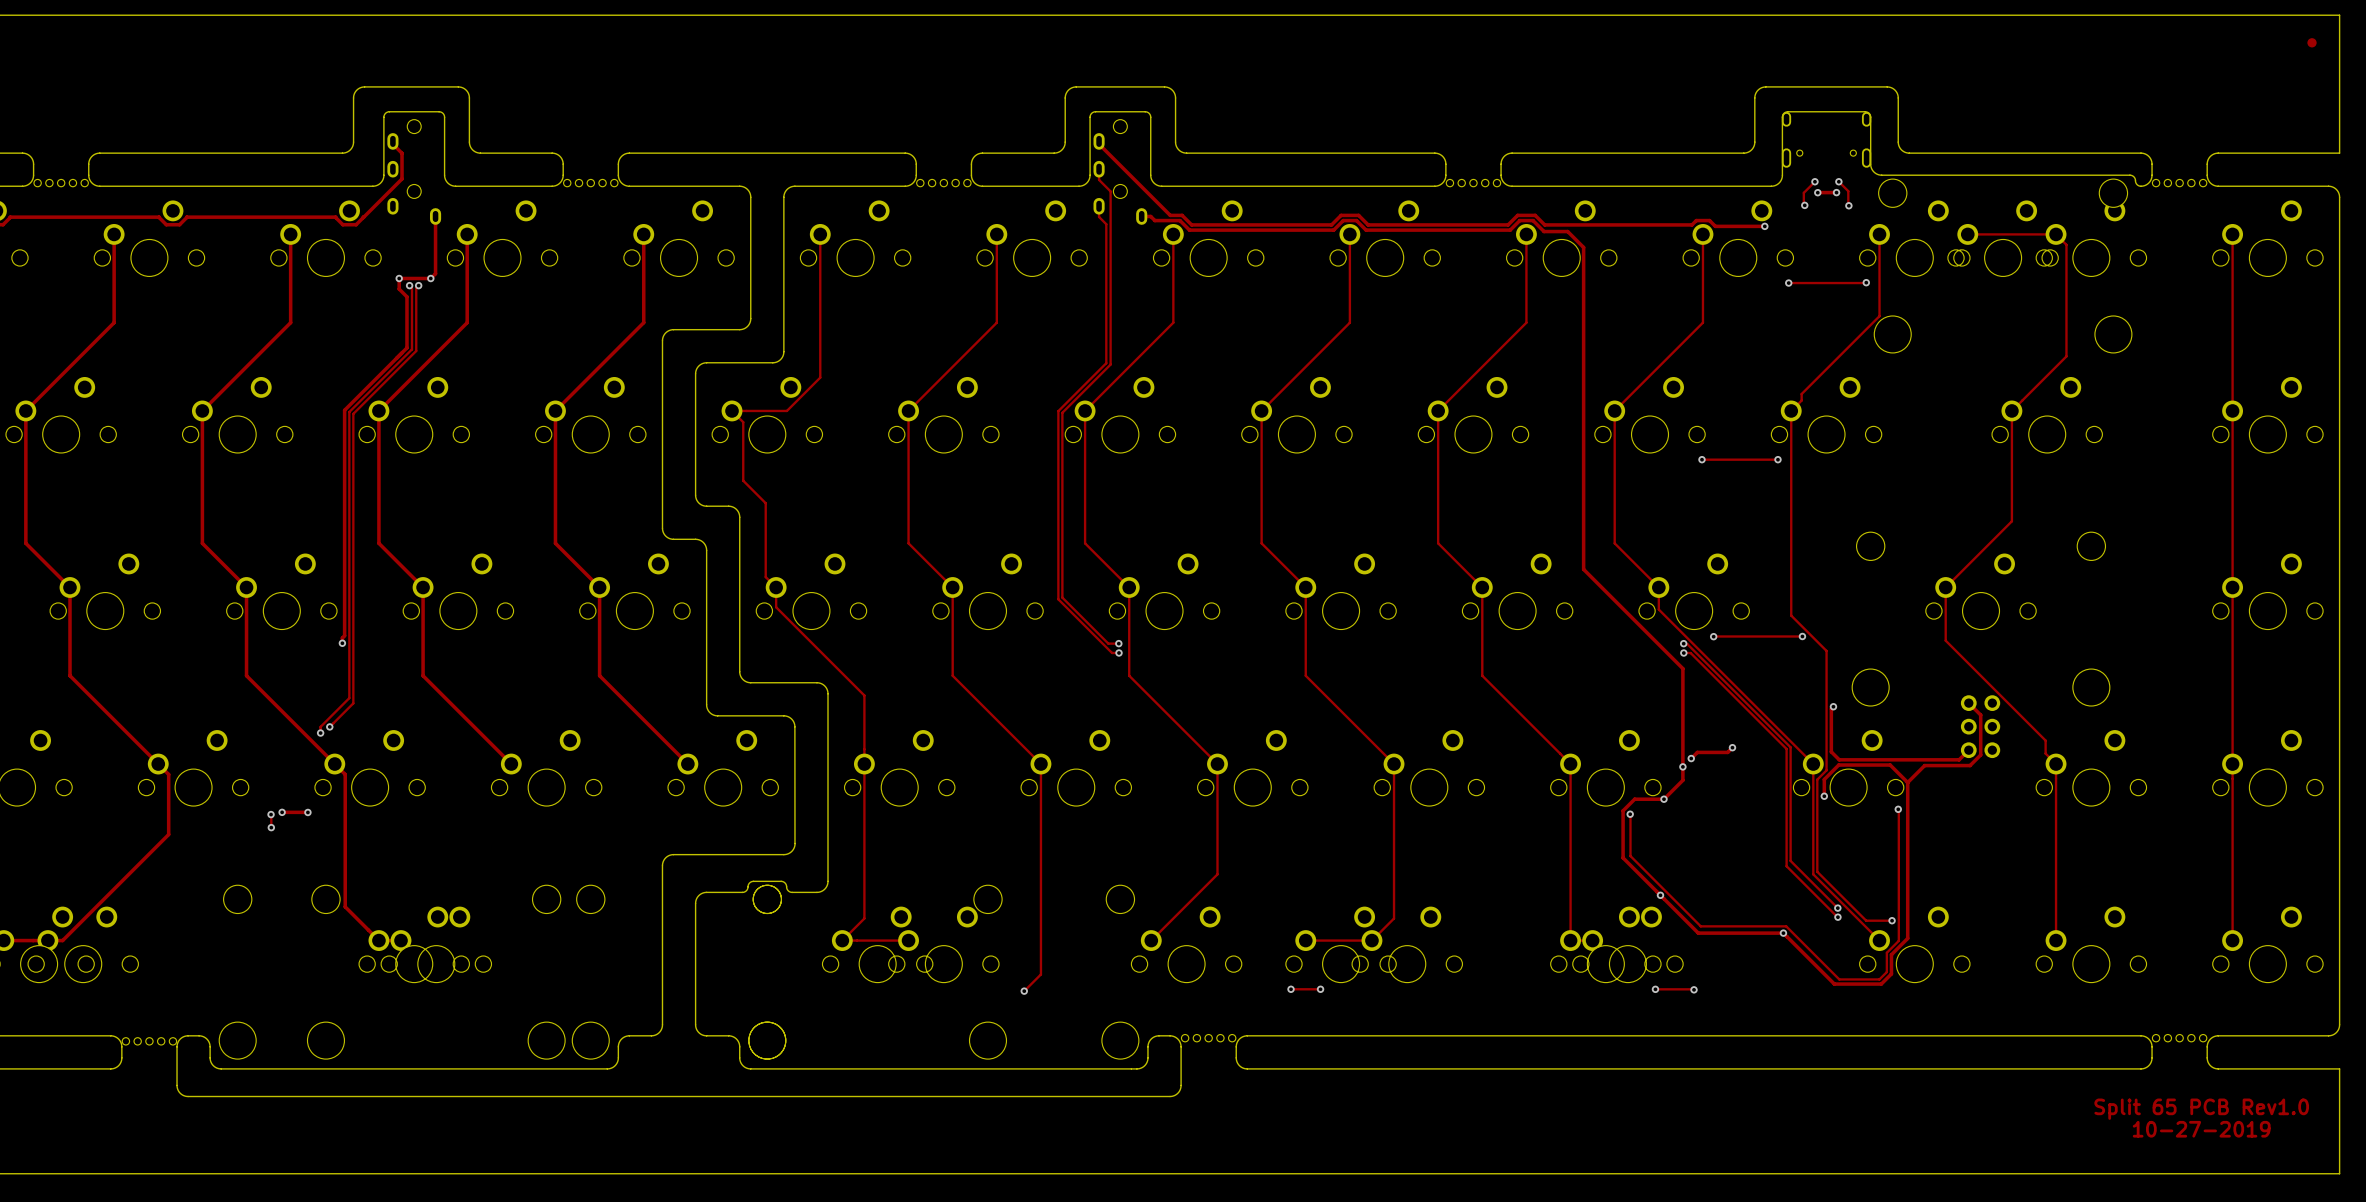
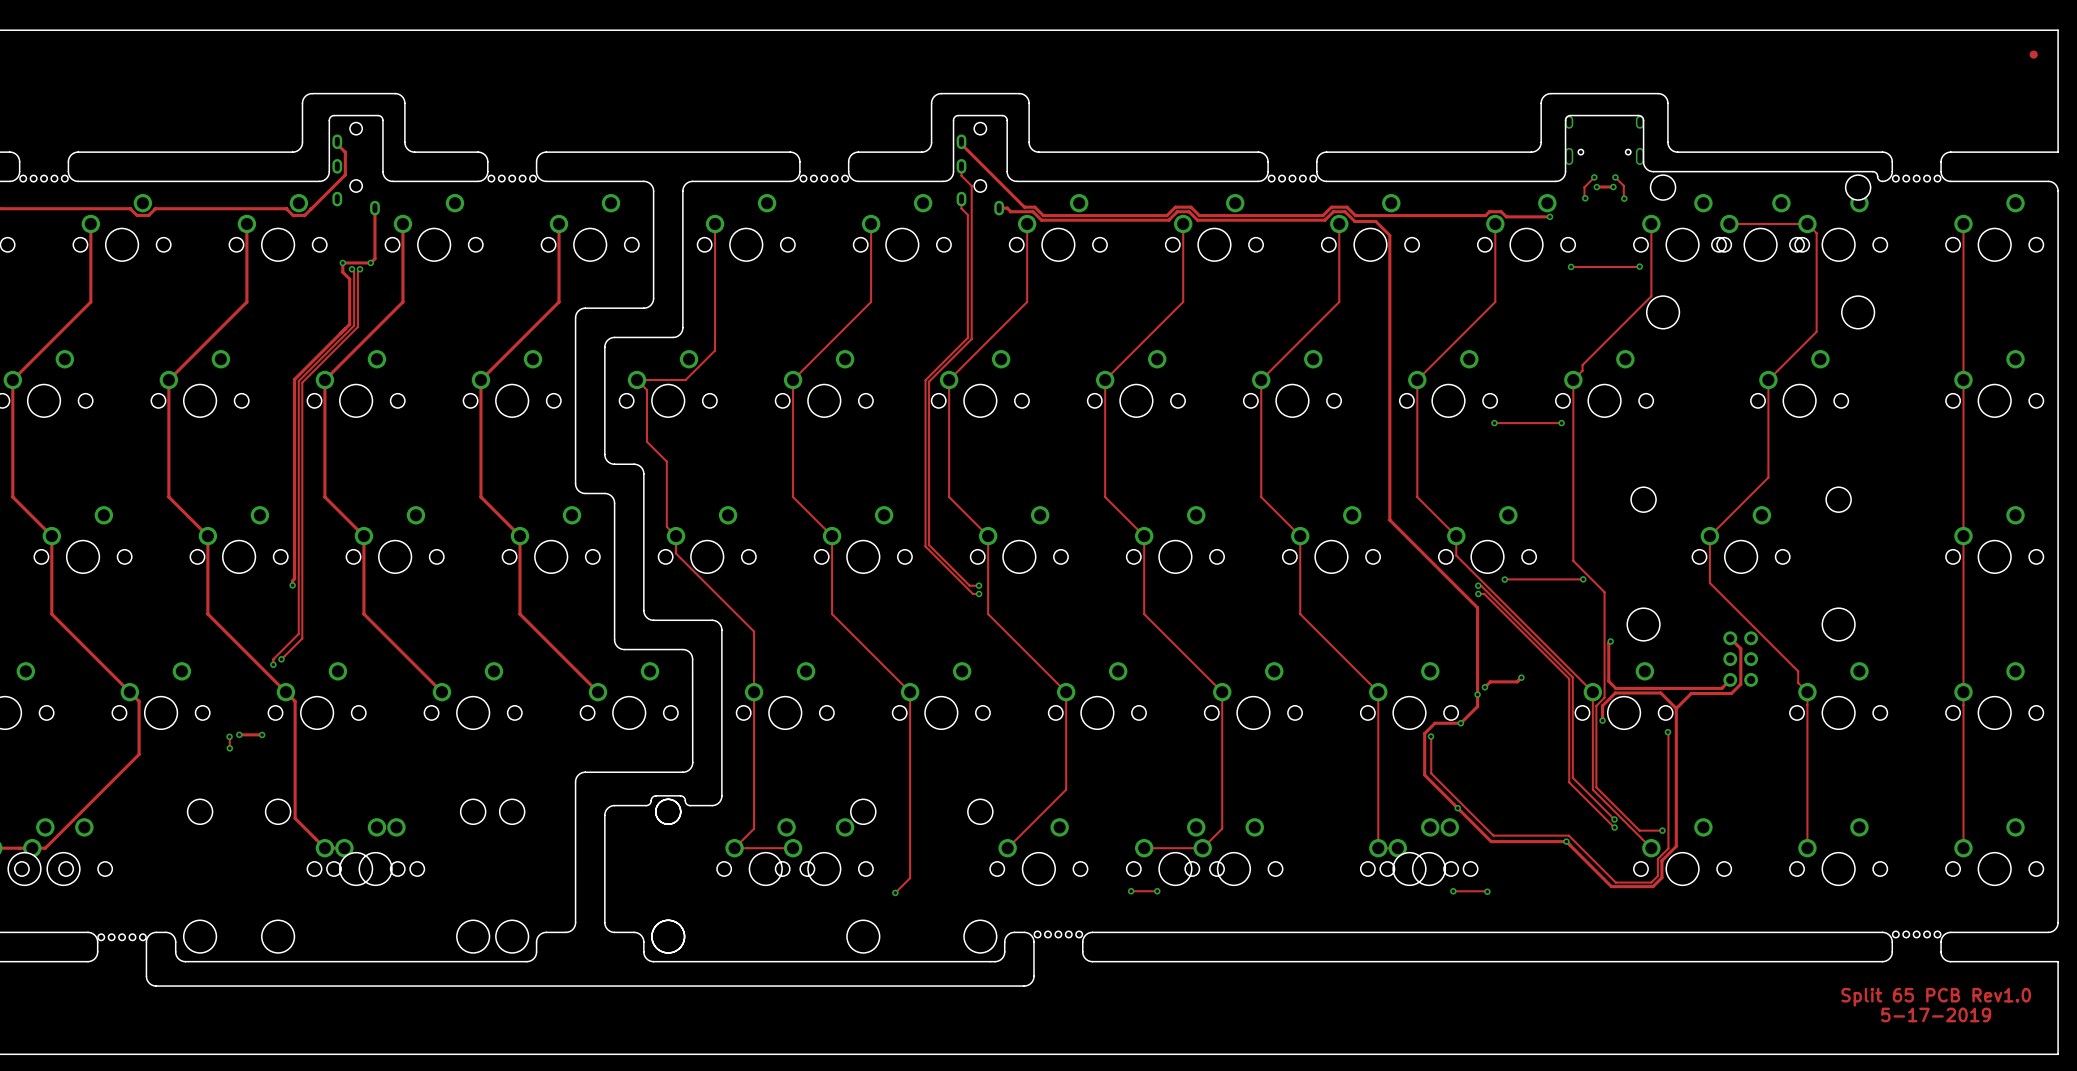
text: 10-27-2019 (2201, 1129) -> 5-17-2019 (1936, 1014)

